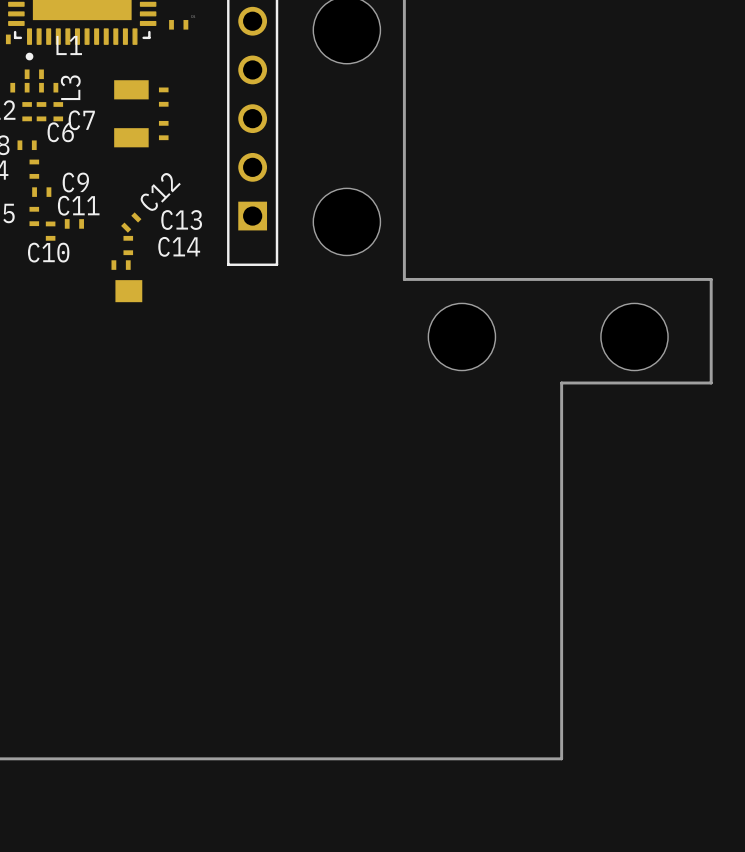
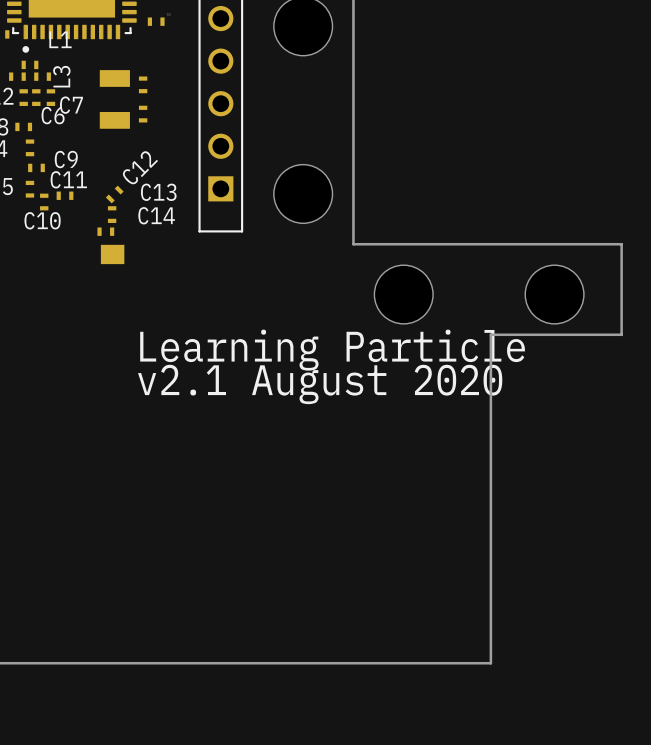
text: none -> Learning Particle (332, 350)
text: none -> v2.1 August 2020 (320, 384)

